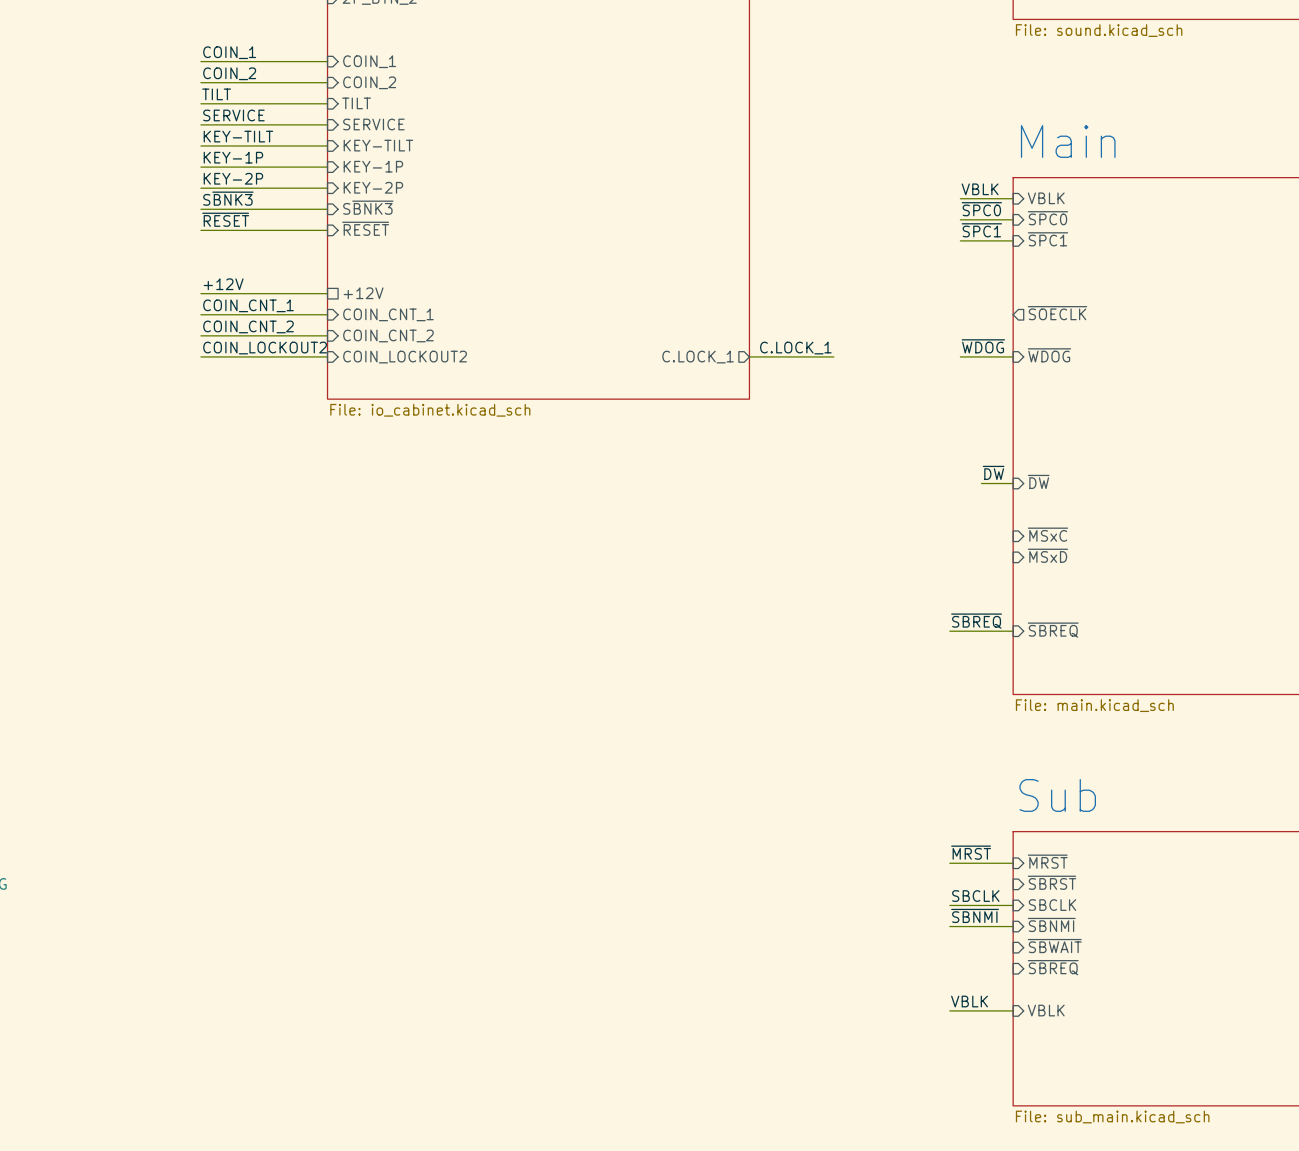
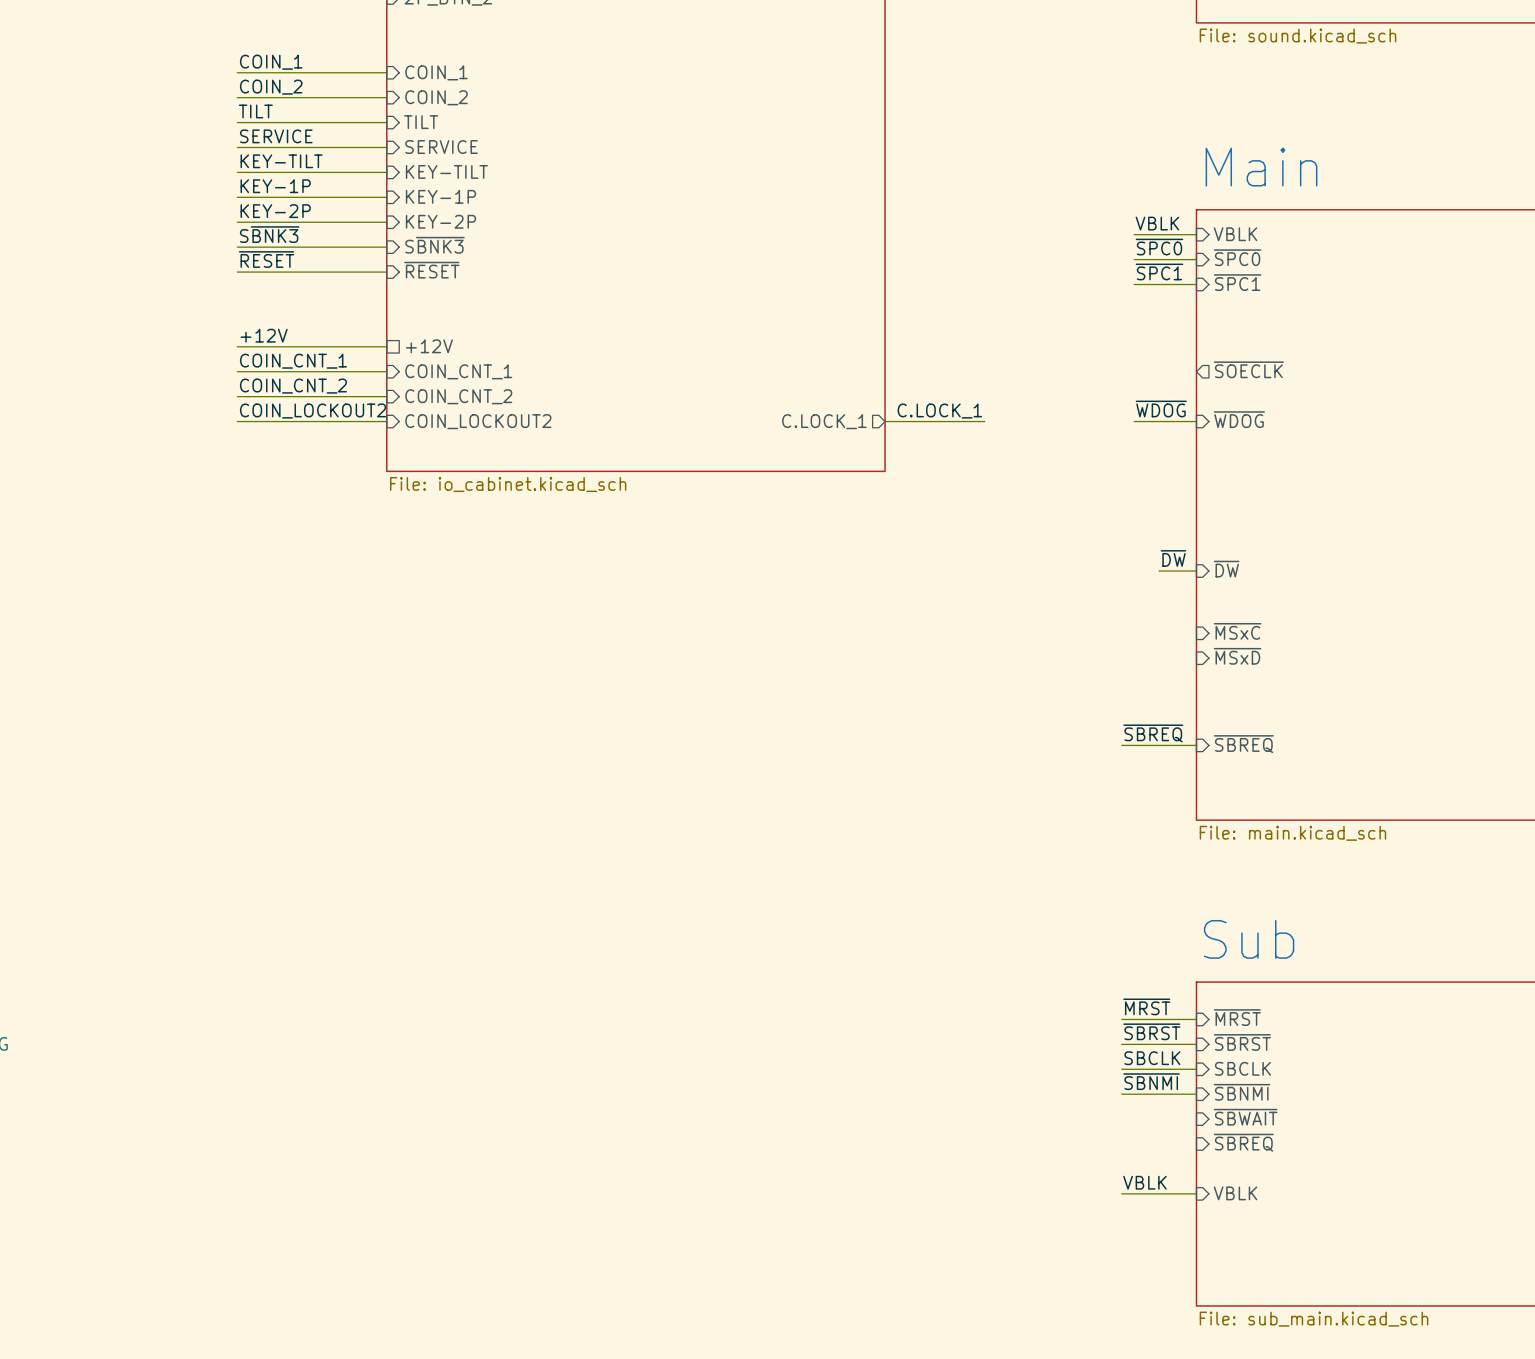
label: none -> ~{SBRST} (1151, 1031)
wire: none -> (1121, 1044) (1196, 1044)

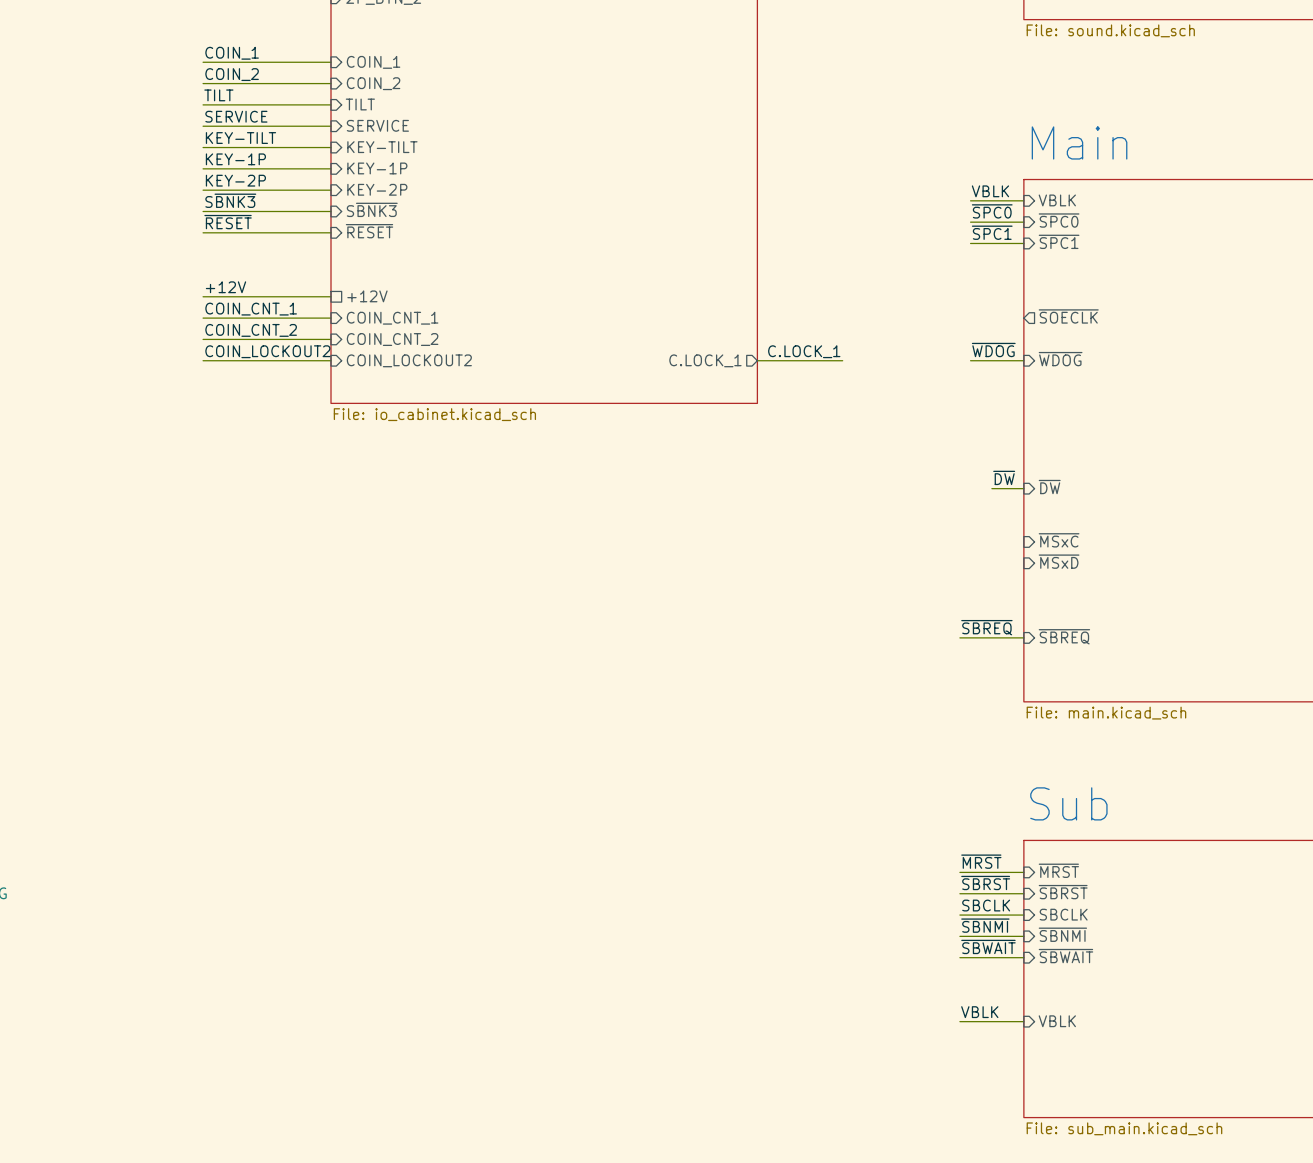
label: none -> ~{SBWAIT} (988, 946)
wire: none -> (959, 957) (1023, 957)
sheet pin: ~{SBREQ} (1243, 1142) -> none

